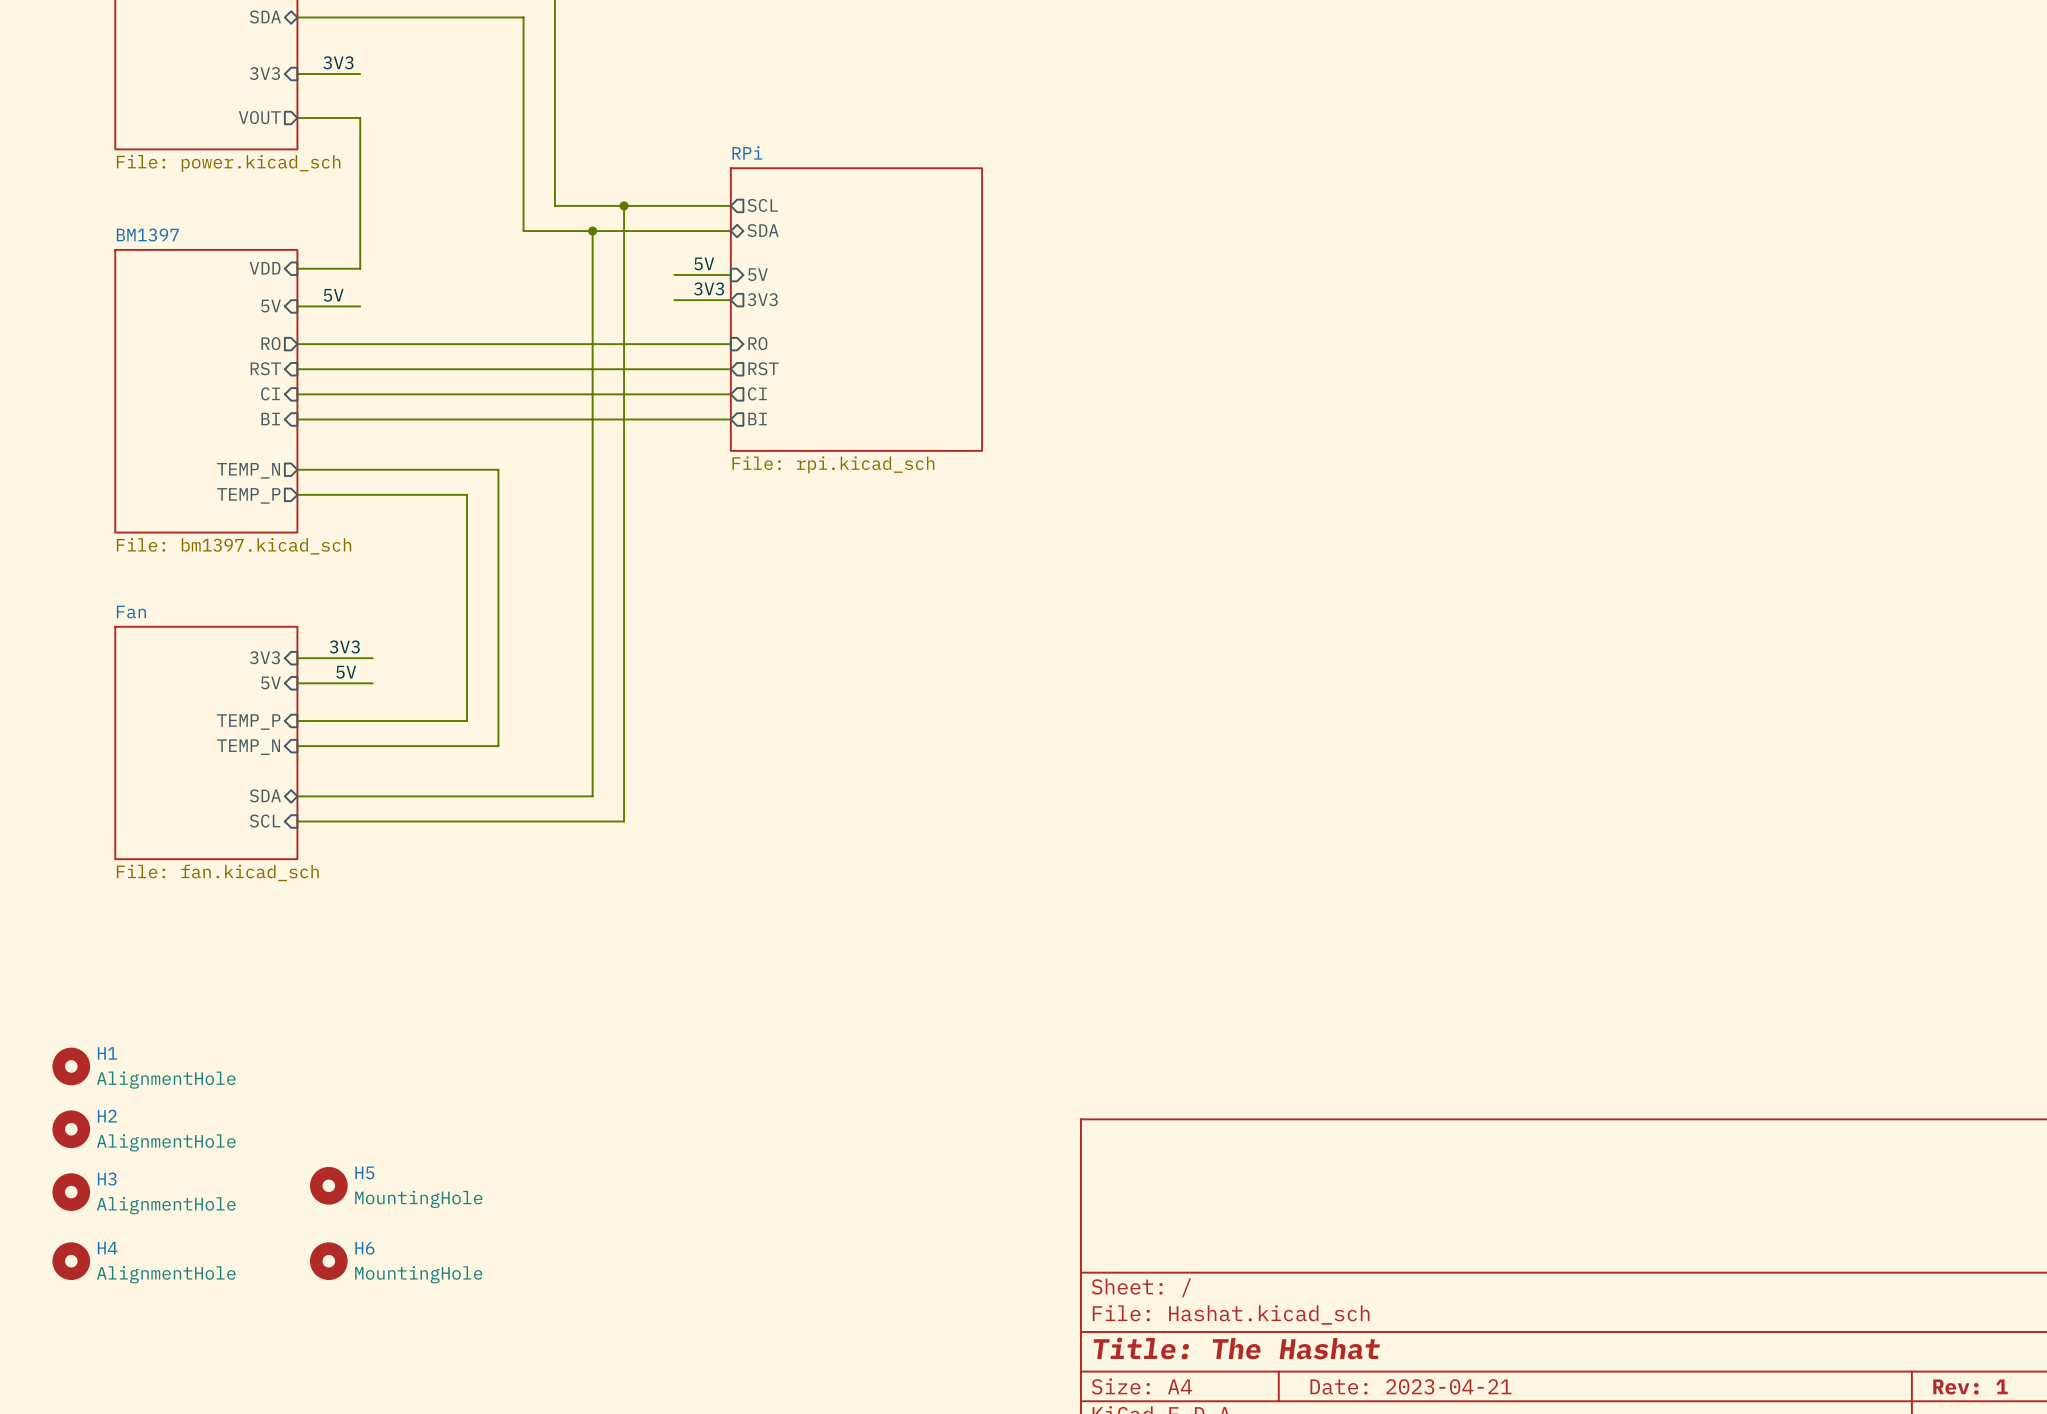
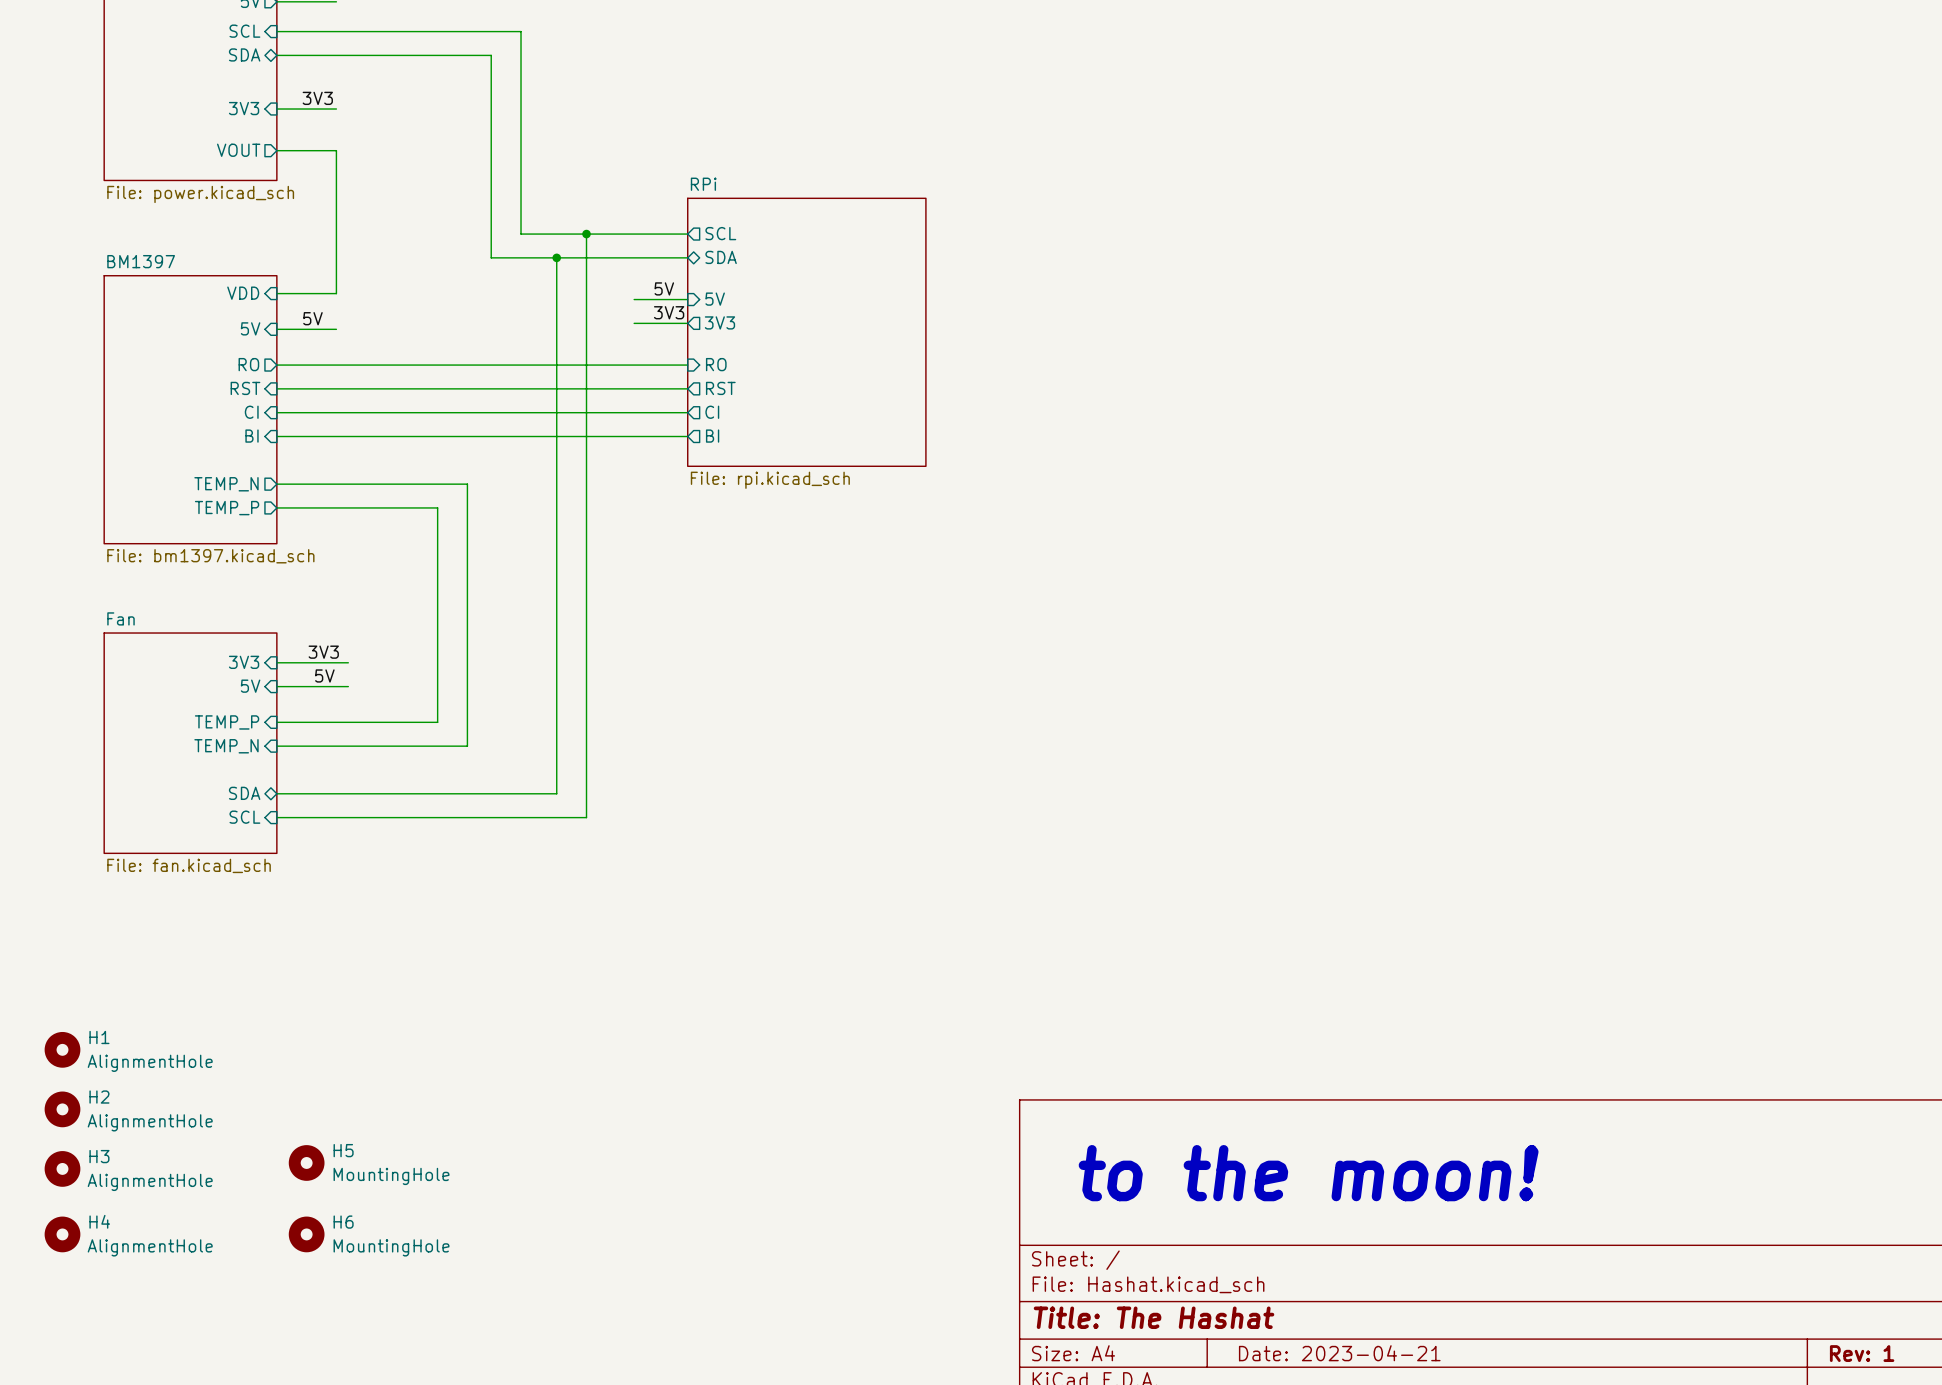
text: none -> to the moon! (1308, 1173)

